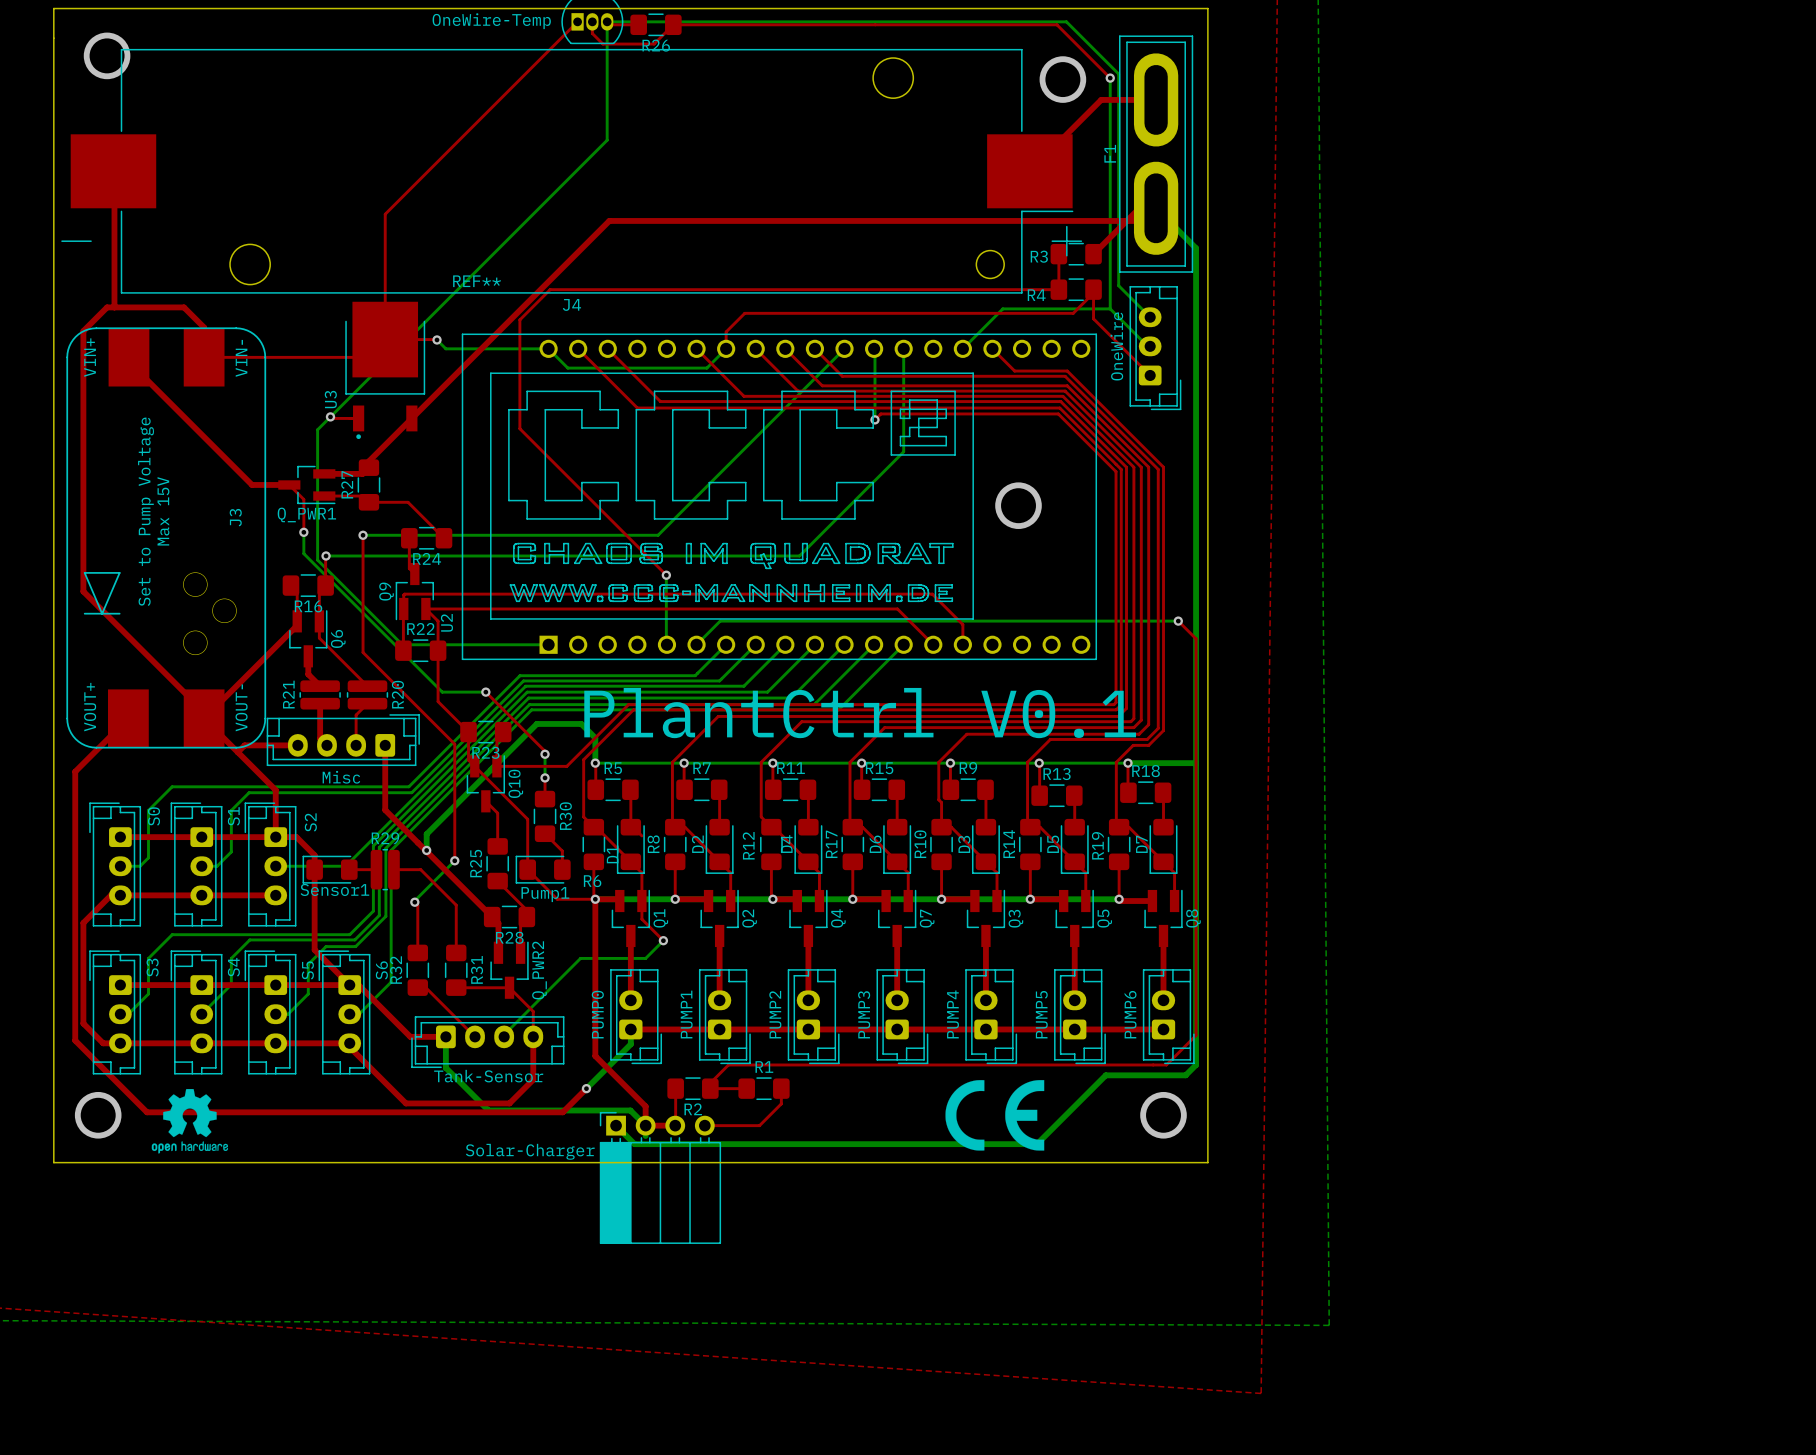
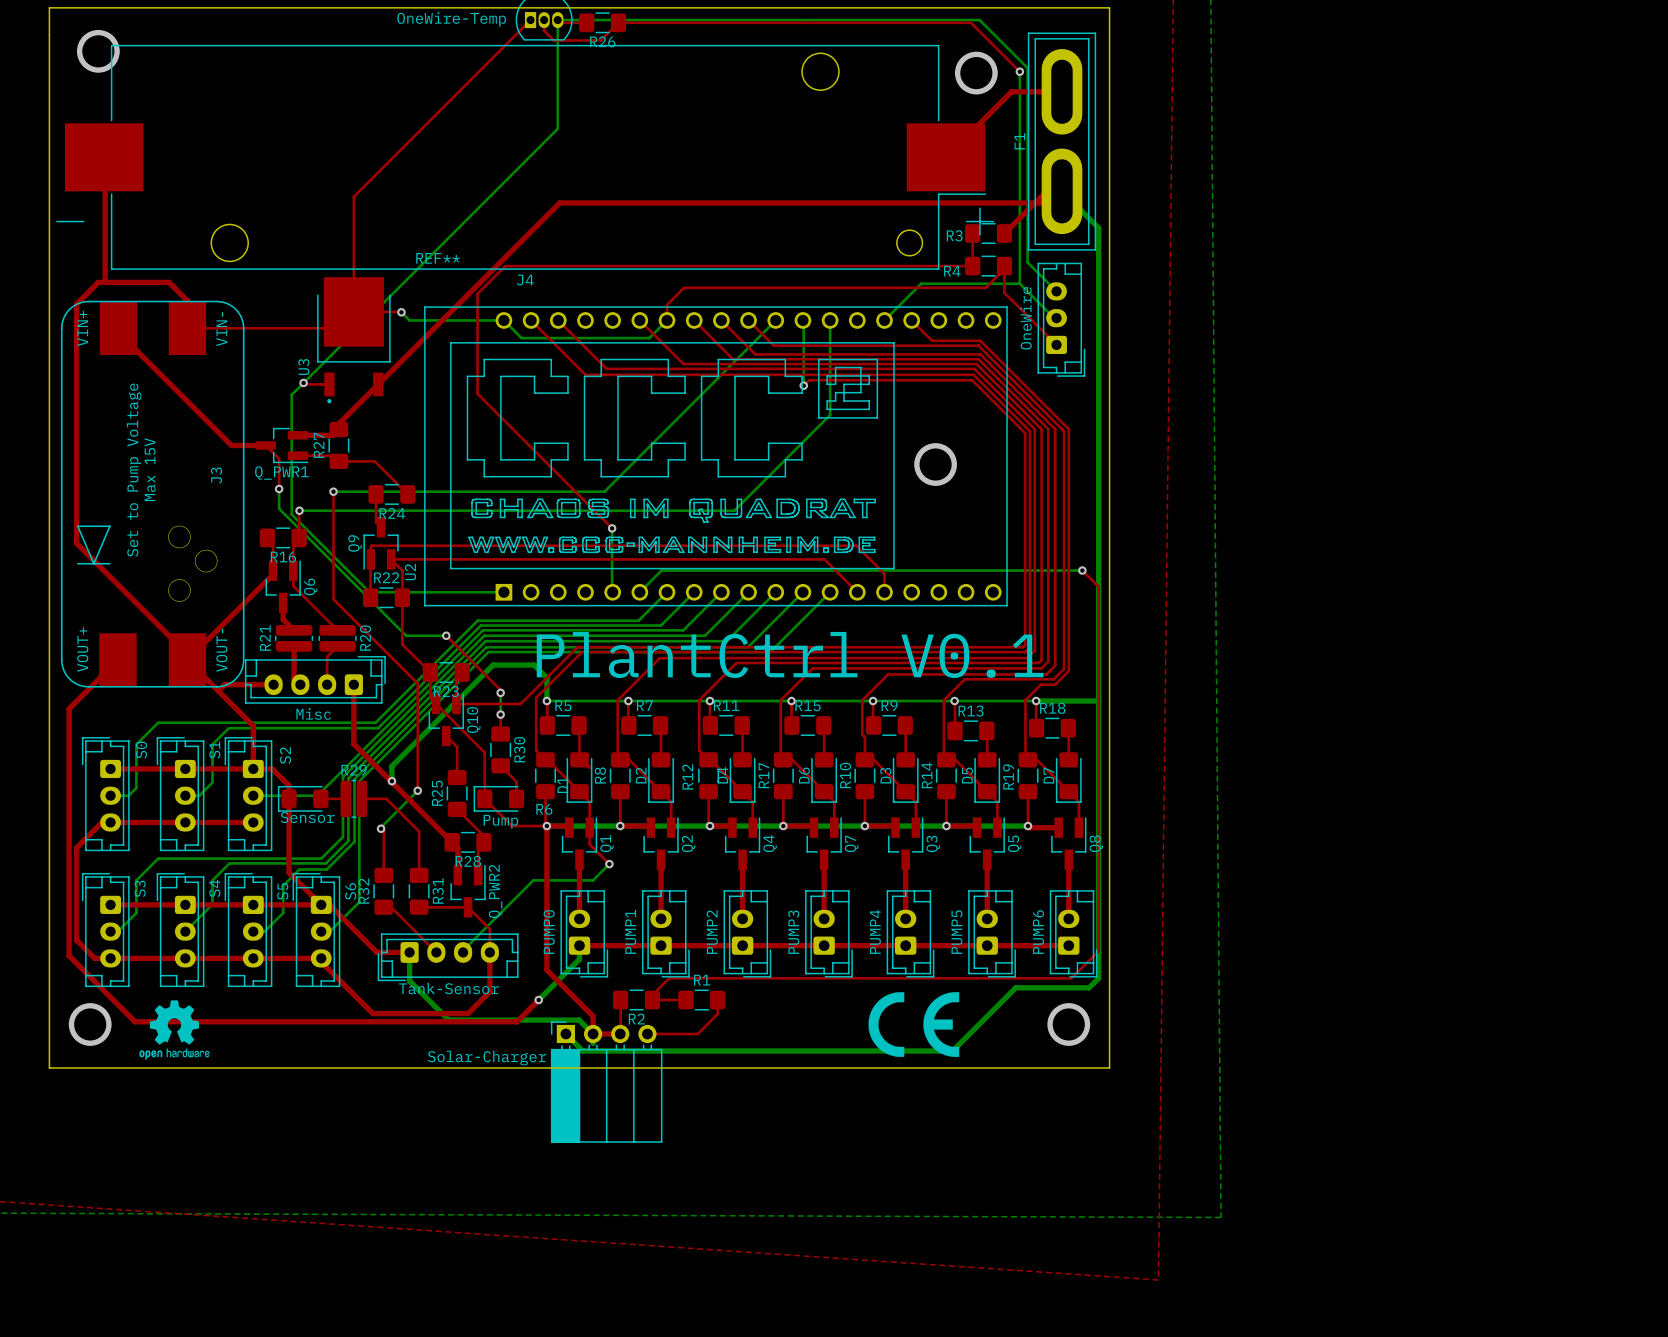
Sensor1 name: Sensor1 (334, 889) -> Sensor (307, 817)
Pump1 name: Pump1 (545, 894) -> Pump (500, 821)

